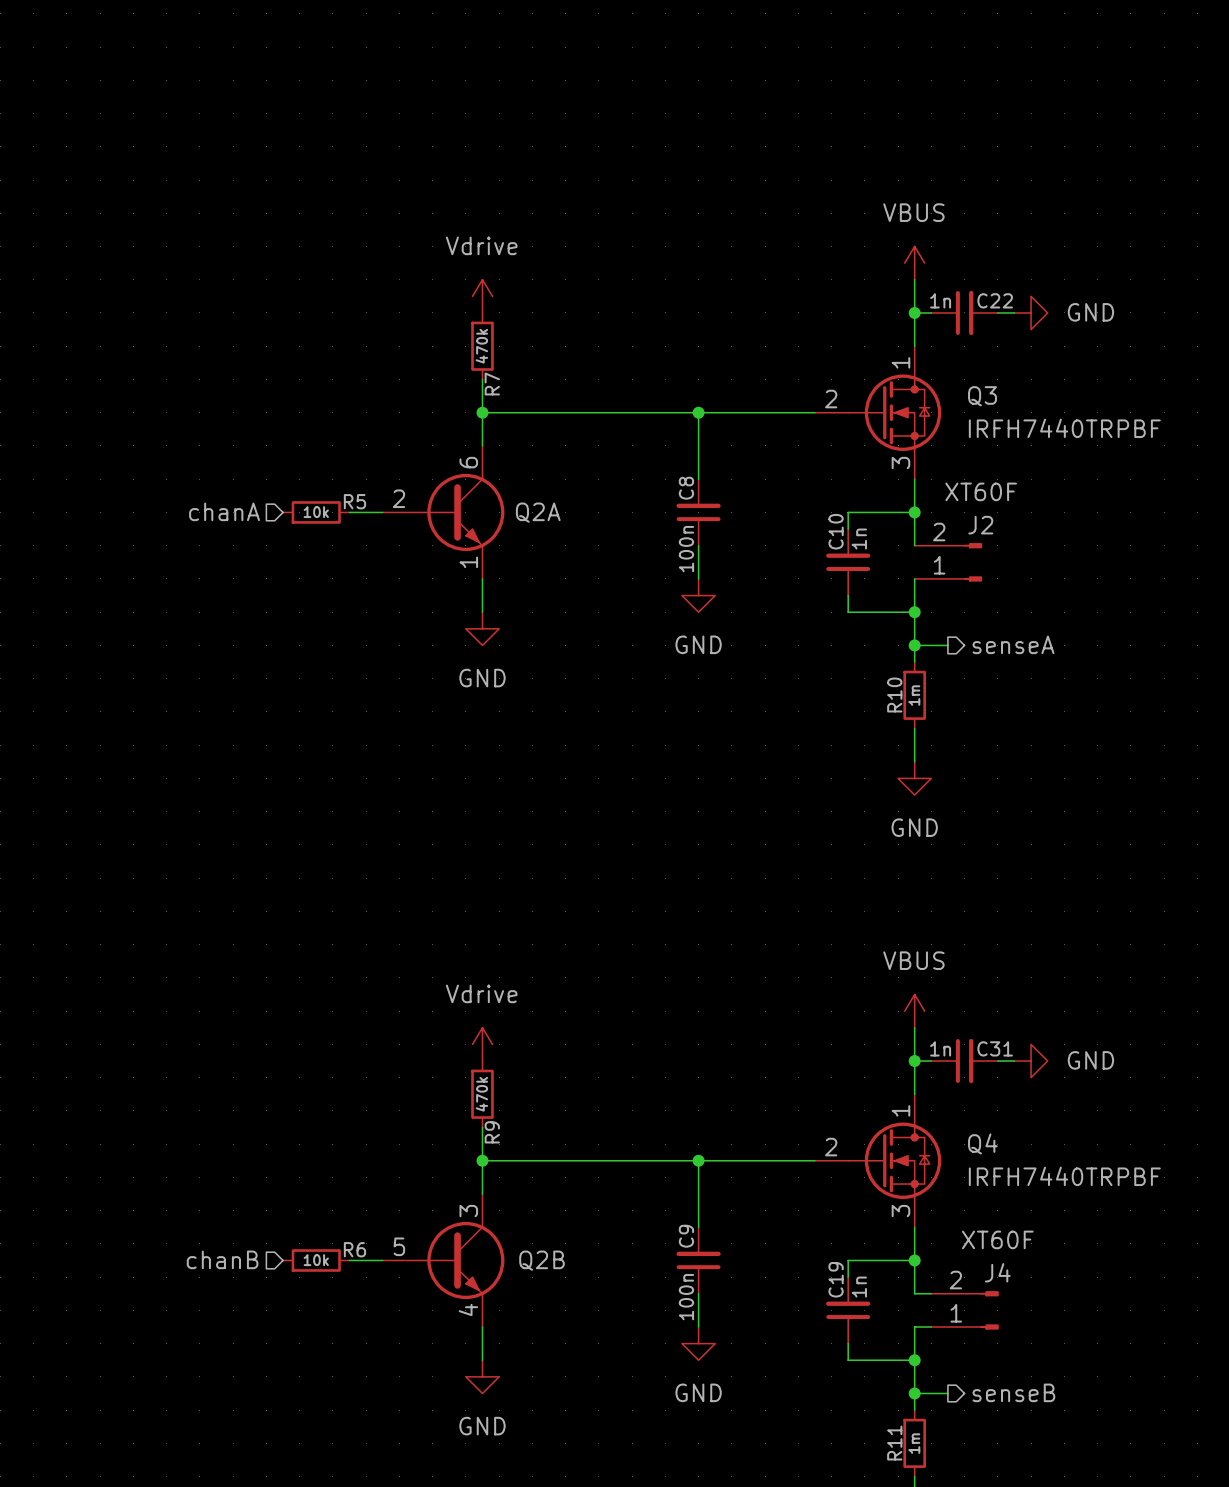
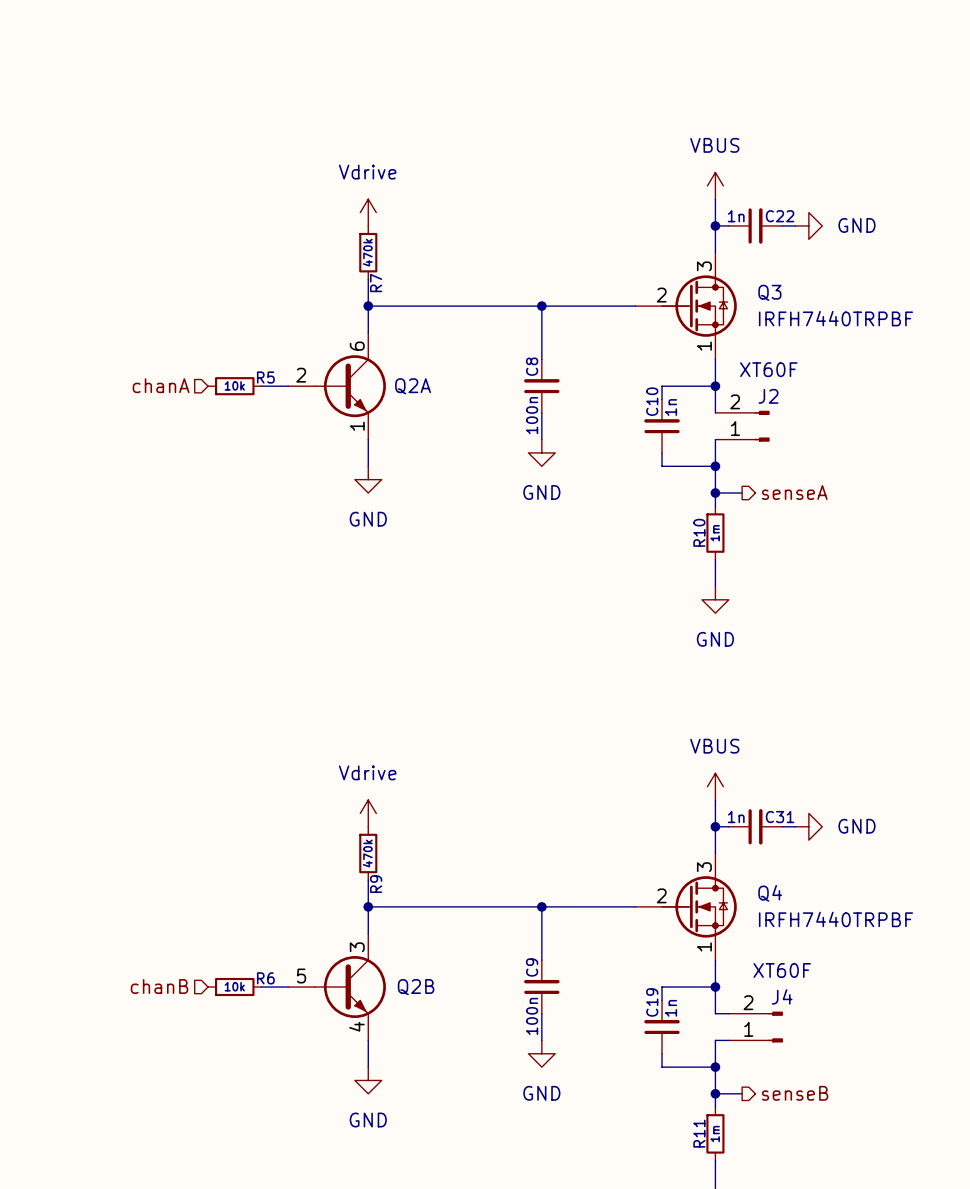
Q3 symbol: [814, 346, 942, 480] -> [635, 252, 737, 360]
Q4 symbol: [814, 1094, 942, 1228] -> [635, 853, 737, 961]

